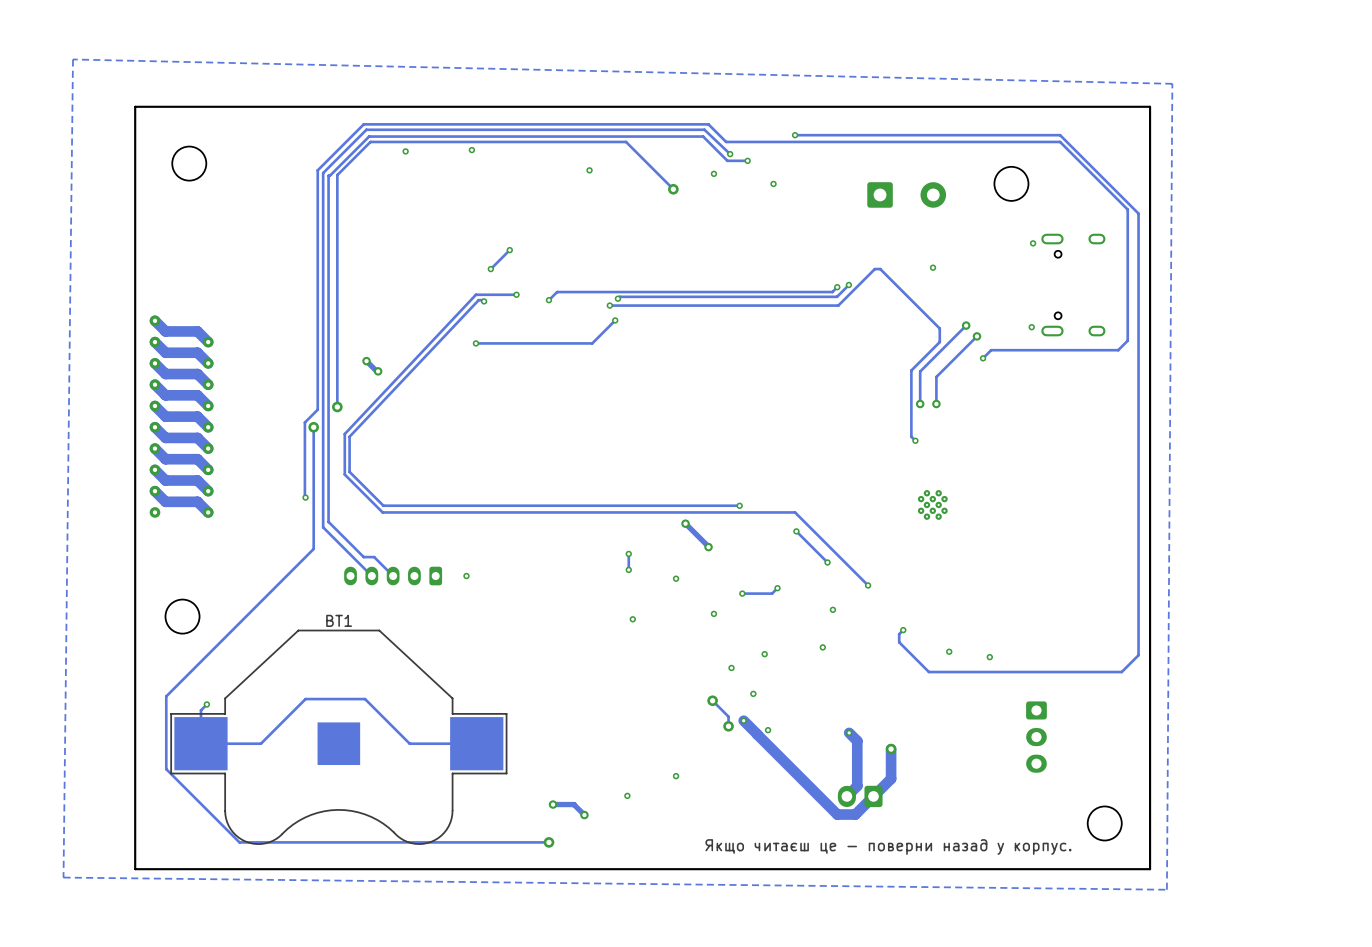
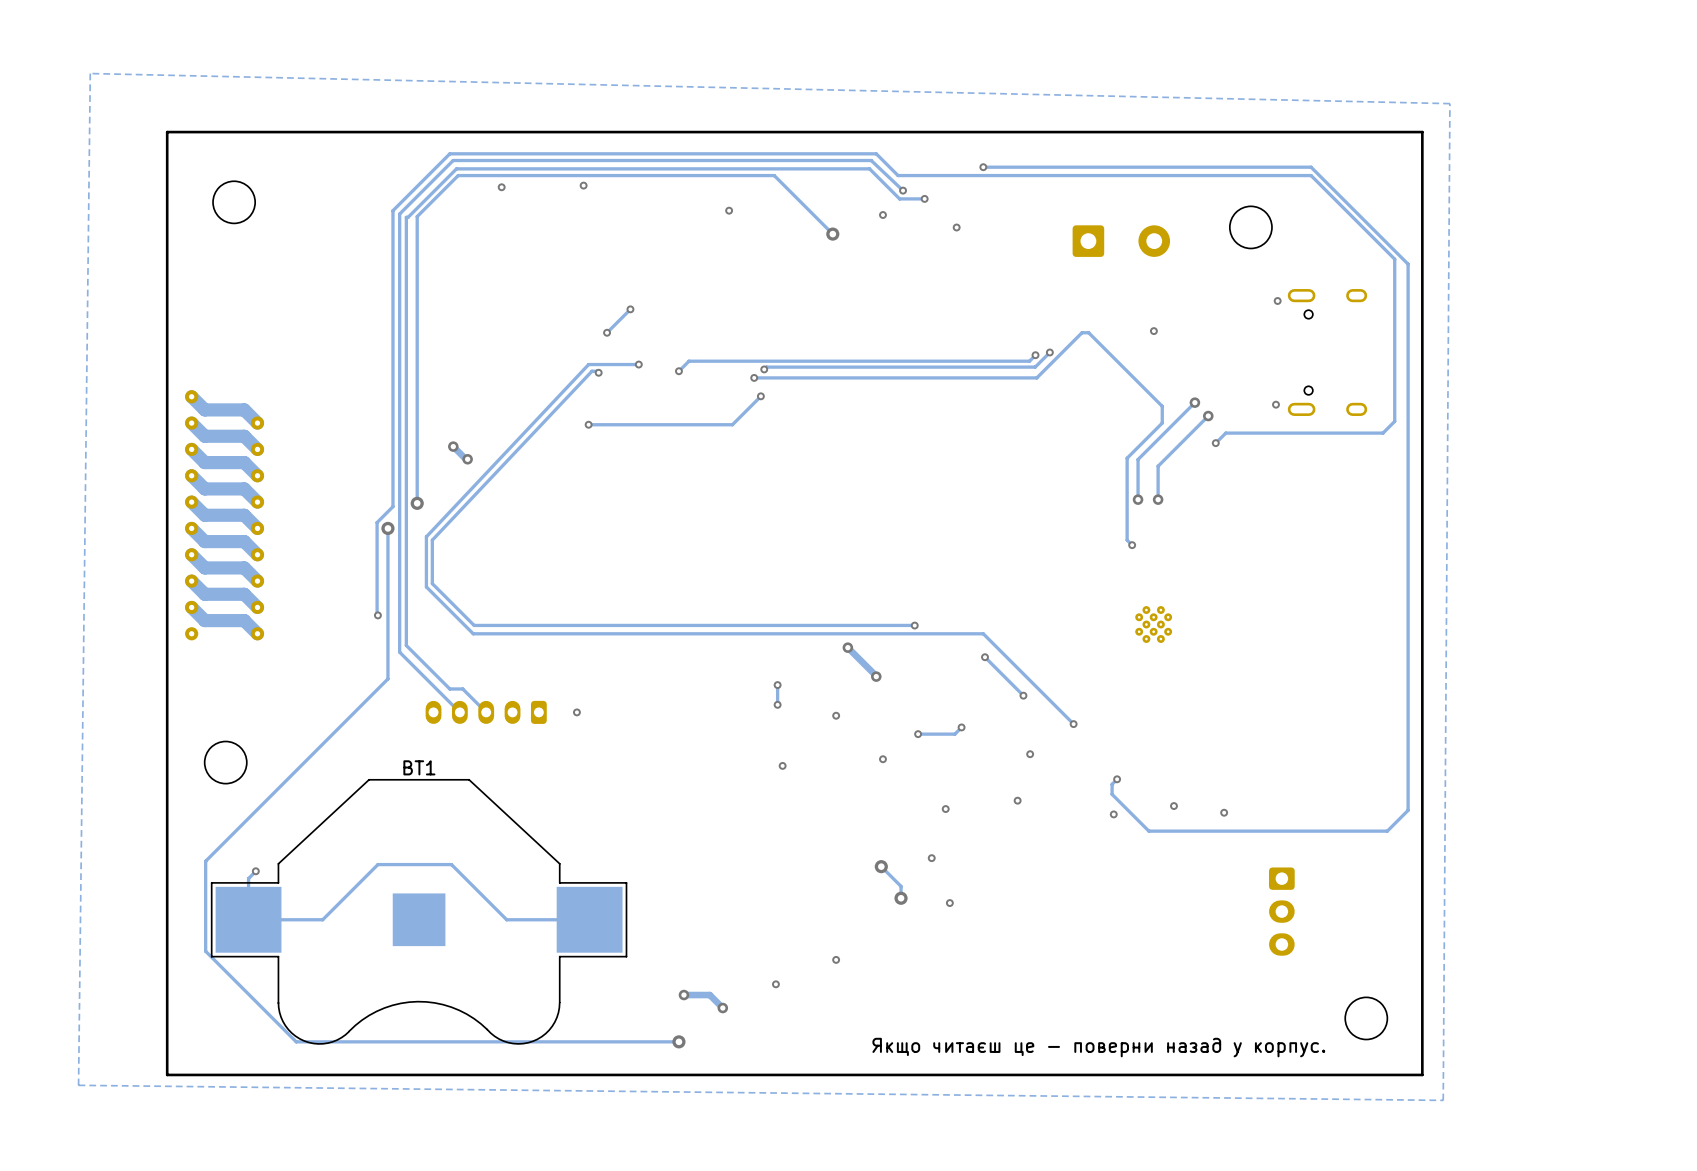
via: none -> (1113, 814)
via: (731, 667) -> none
track: (743, 720) (757, 734) -> none
via: (743, 720) -> none
track: (849, 732) (857, 740) (857, 786) (846, 796) -> none
via: (849, 732) -> none
track: (757, 734) (837, 814) (855, 814) (891, 778) (891, 749) -> none
via: (891, 749) -> none
part: (860, 796) -> none

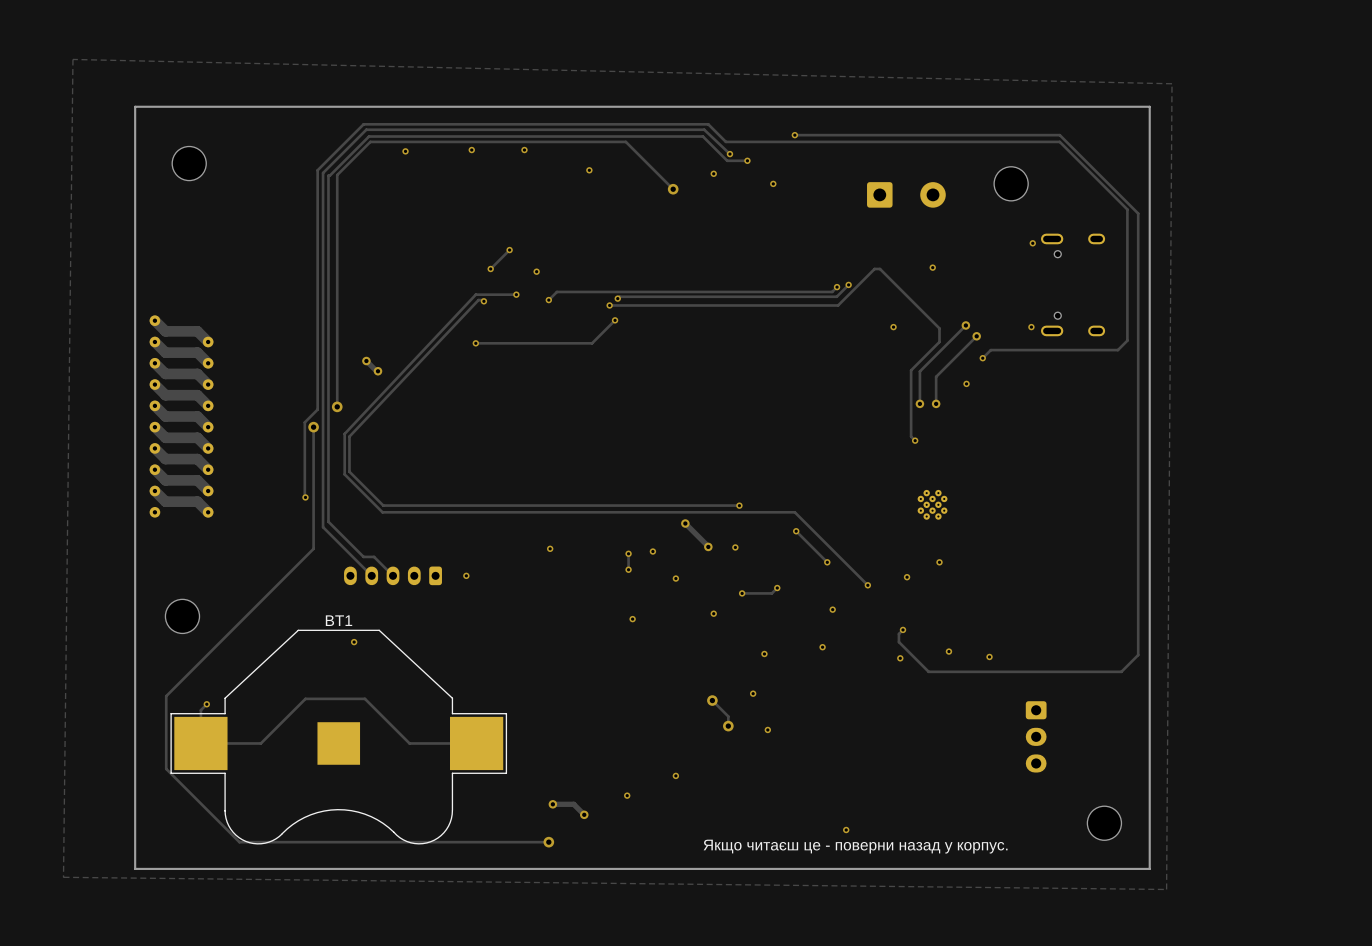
via: none -> (524, 150)
via: none -> (536, 271)
via: none -> (893, 327)
via: none -> (966, 383)
via: none -> (735, 547)
via: none -> (550, 548)
via: none -> (652, 551)
via: none -> (939, 562)
via: none -> (907, 577)
via: none -> (354, 642)
via: none -> (846, 830)

